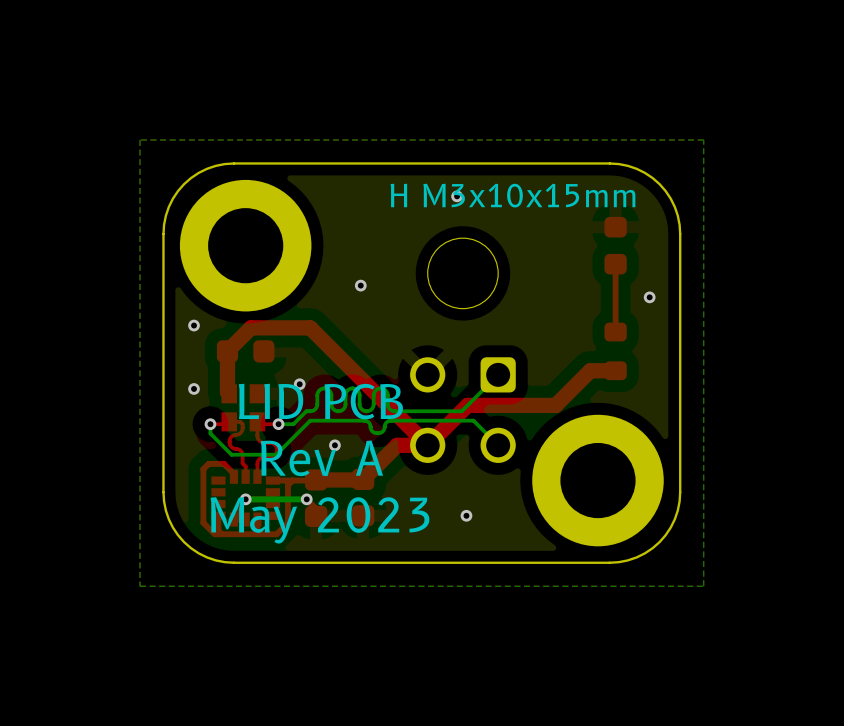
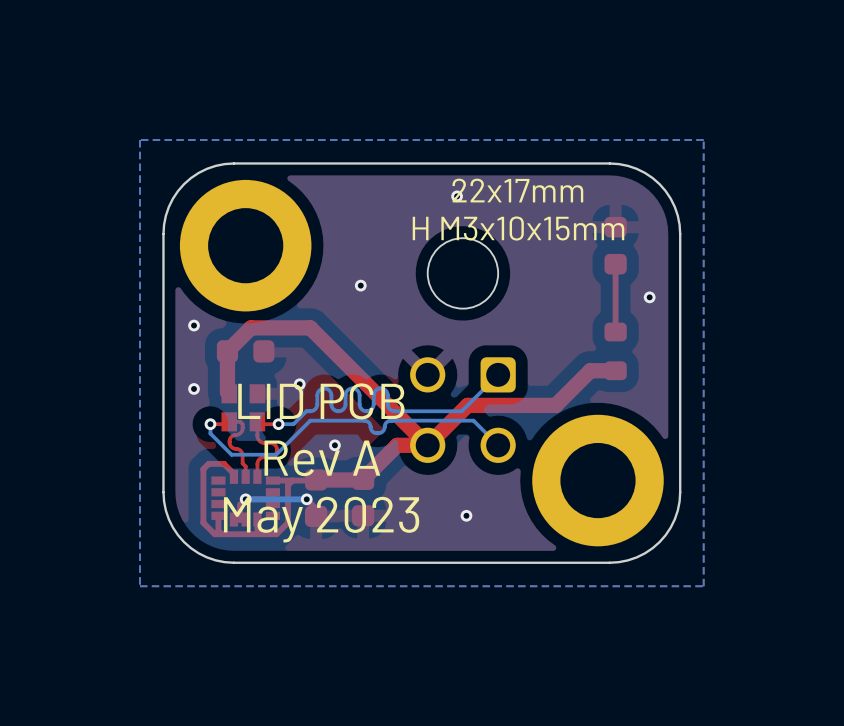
text: H M3x10x15mm (512, 195) -> 22x17mm (517, 190)
text: none -> H M3x10x15mm (518, 228)

